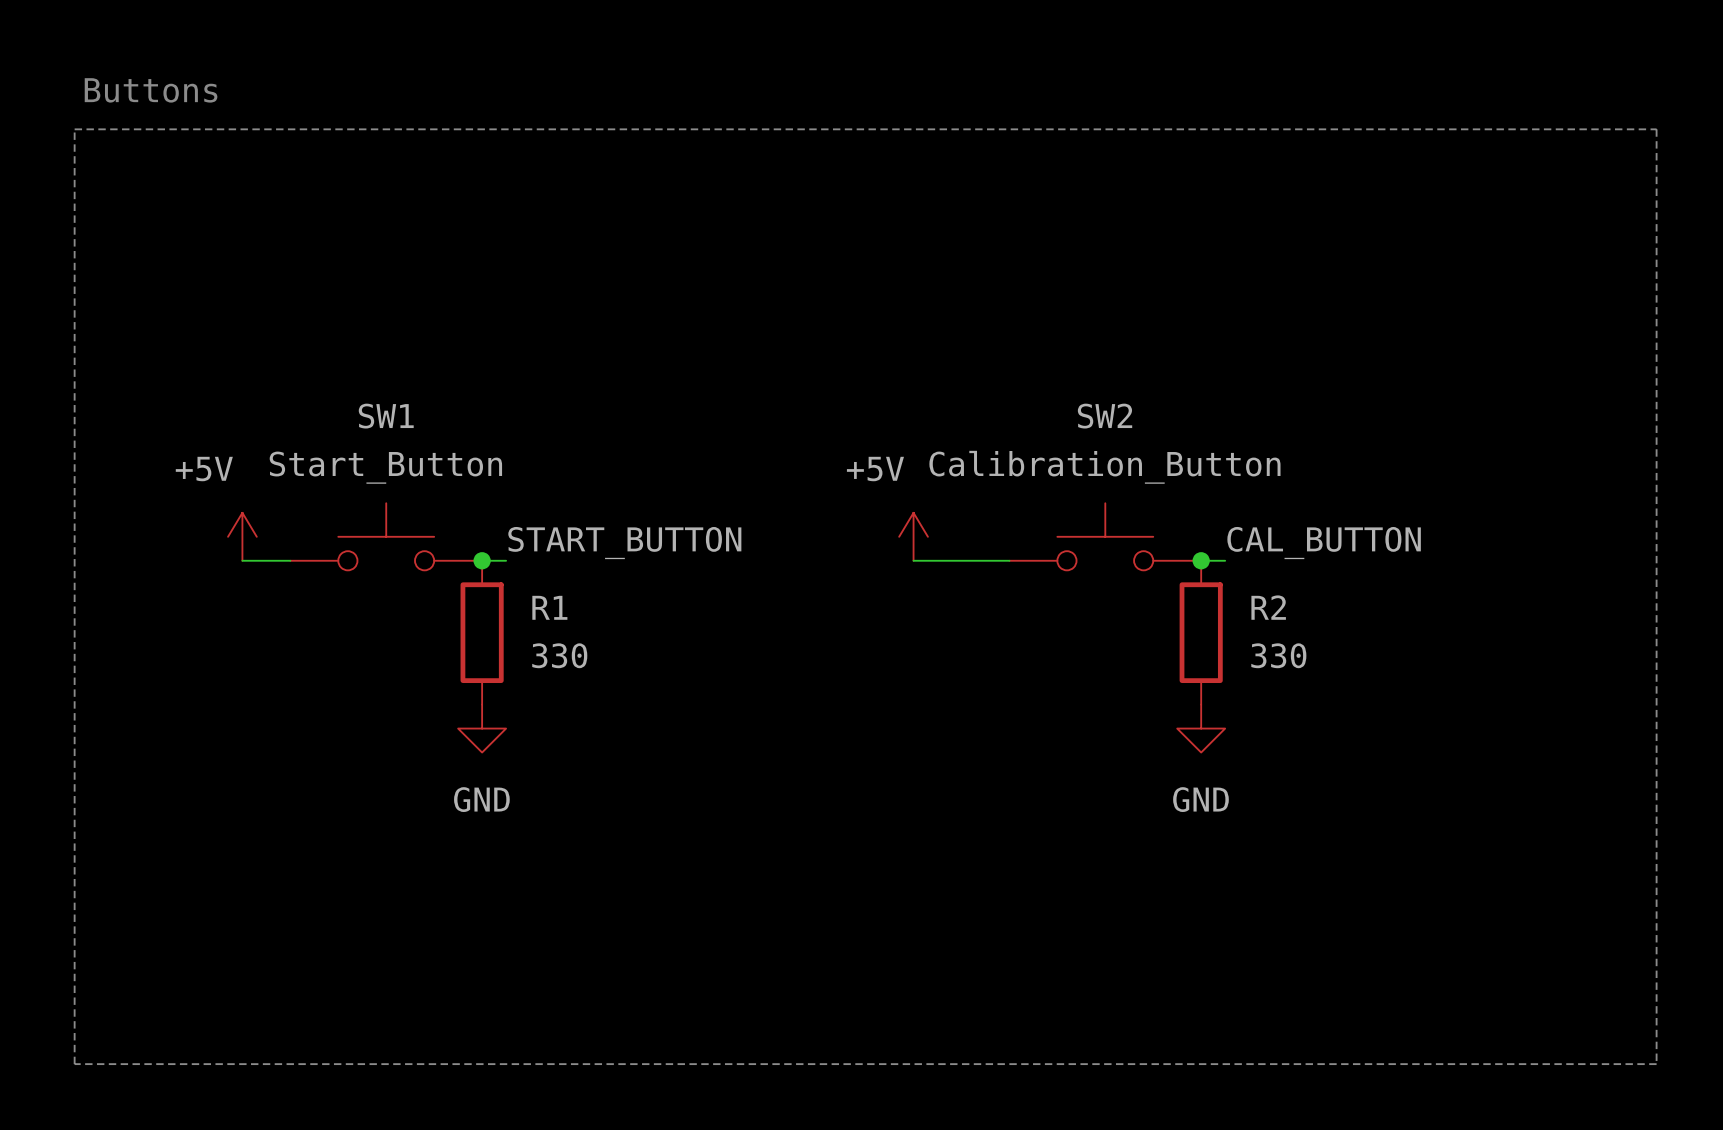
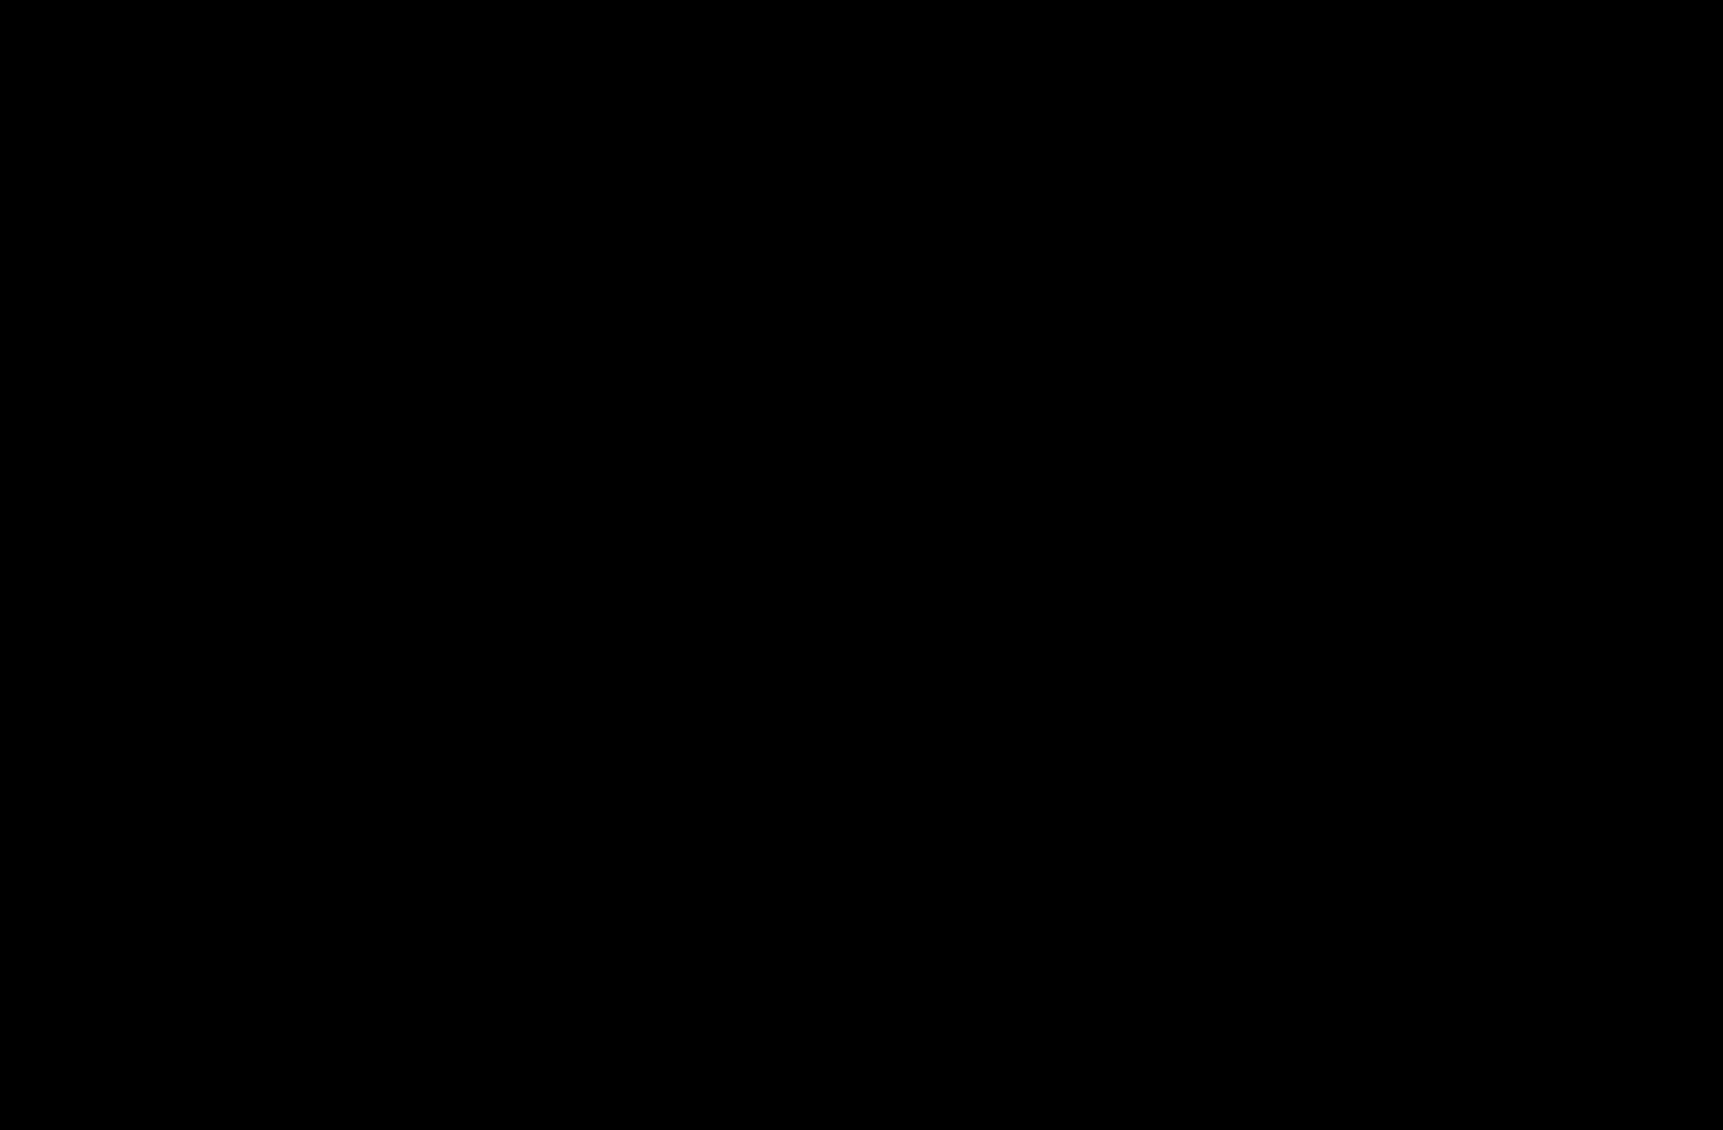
text: Buttons (151, 90) -> none
line: (74, 129) (1656, 129) (1656, 1064) (74, 1064) (74, 129) -> none
power symbol: +5V (242, 536) -> none
SW1: Start_Button (386, 536) -> none
power symbol: +5V (913, 536) -> none
SW2: Calibration_Button (1105, 536) -> none
label: START_BUTTON (624, 543) -> none
label: CAL_BUTTON (1324, 543) -> none
wire: (242, 560) (290, 560) -> none
wire: (482, 560) (506, 560) -> none
junction: (482, 560) -> none
wire: (913, 560) (1009, 560) -> none
wire: (1201, 560) (1225, 560) -> none
junction: (1201, 560) -> none
R1: 330 (482, 632) -> none
R2: 330 (1201, 632) -> none
power symbol: GND (482, 728) -> none
power symbol: GND (1201, 728) -> none

